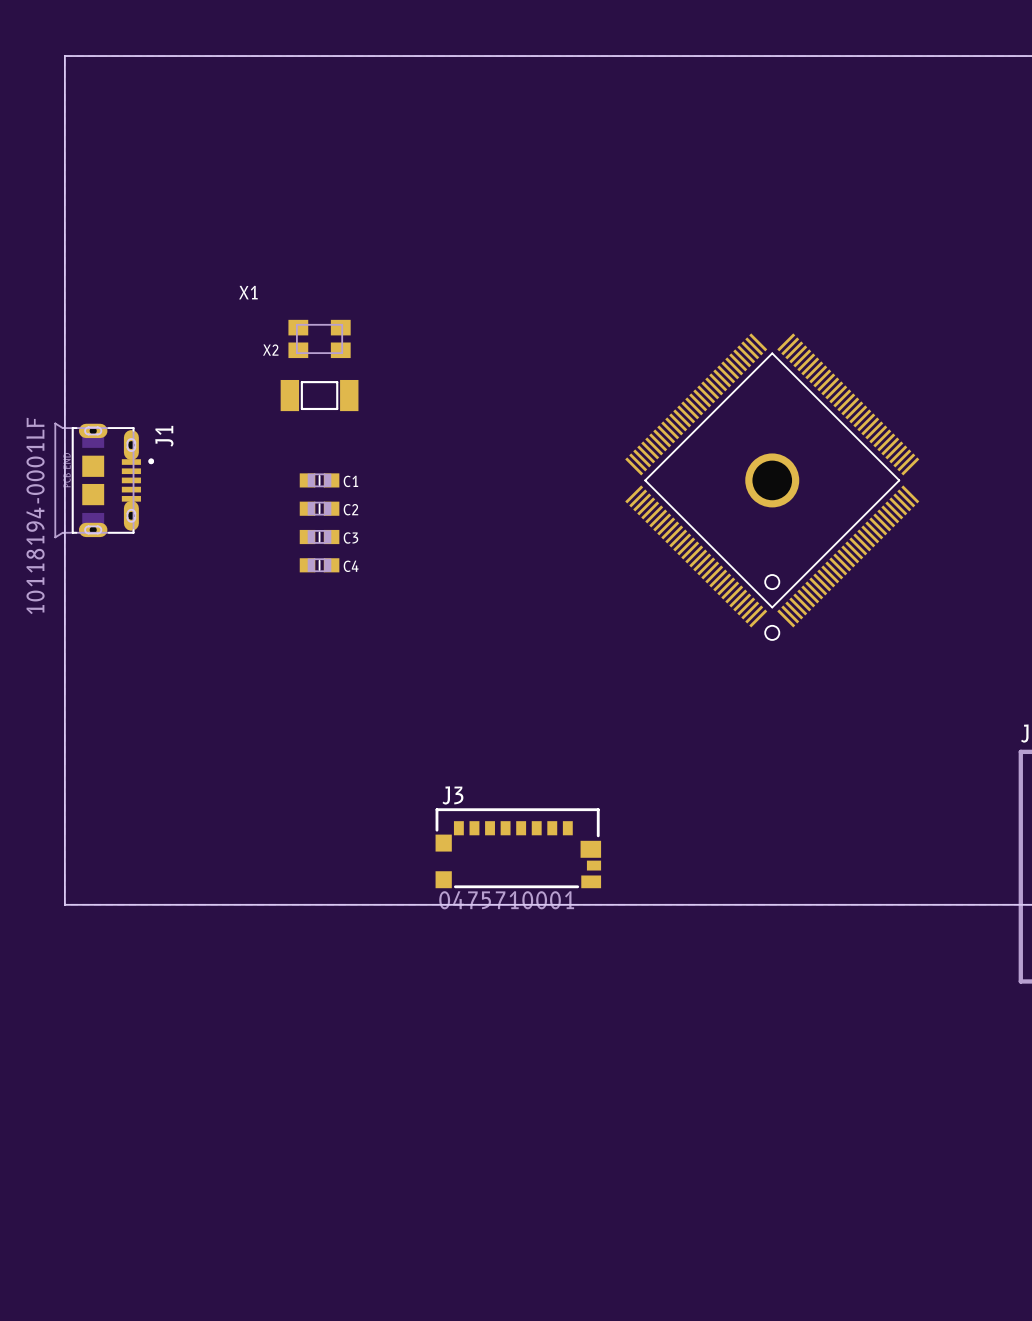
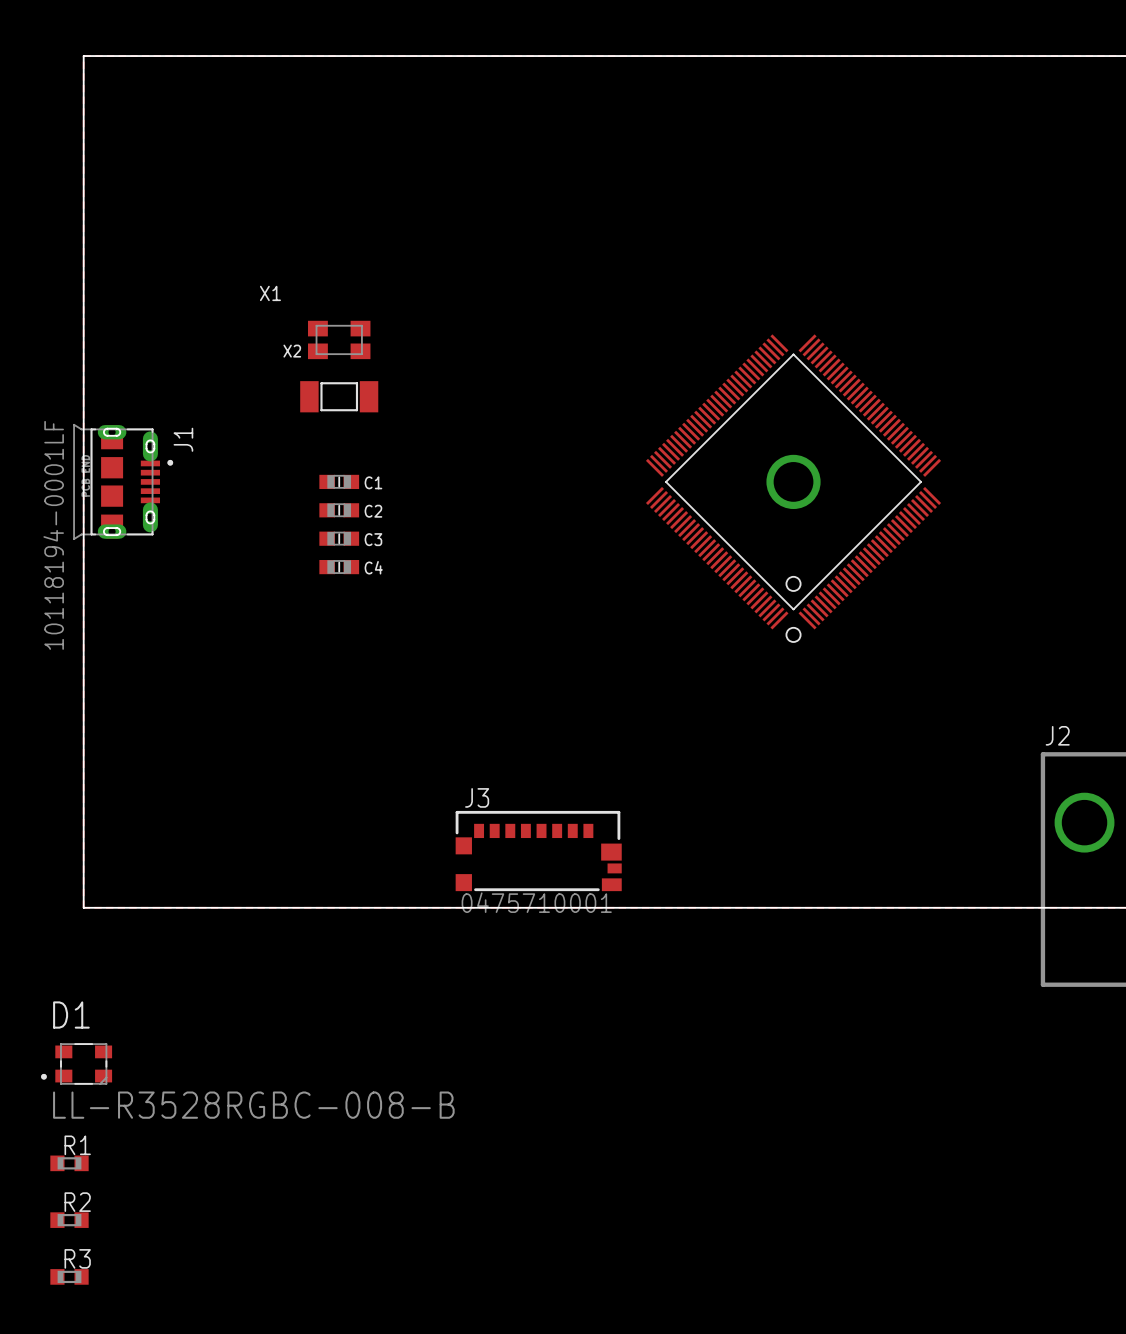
D1: none -> LL-R3528RGBC-008-B (76, 1063)
R1: none -> (69, 1163)
R2: none -> (69, 1220)
R3: none -> (69, 1276)

